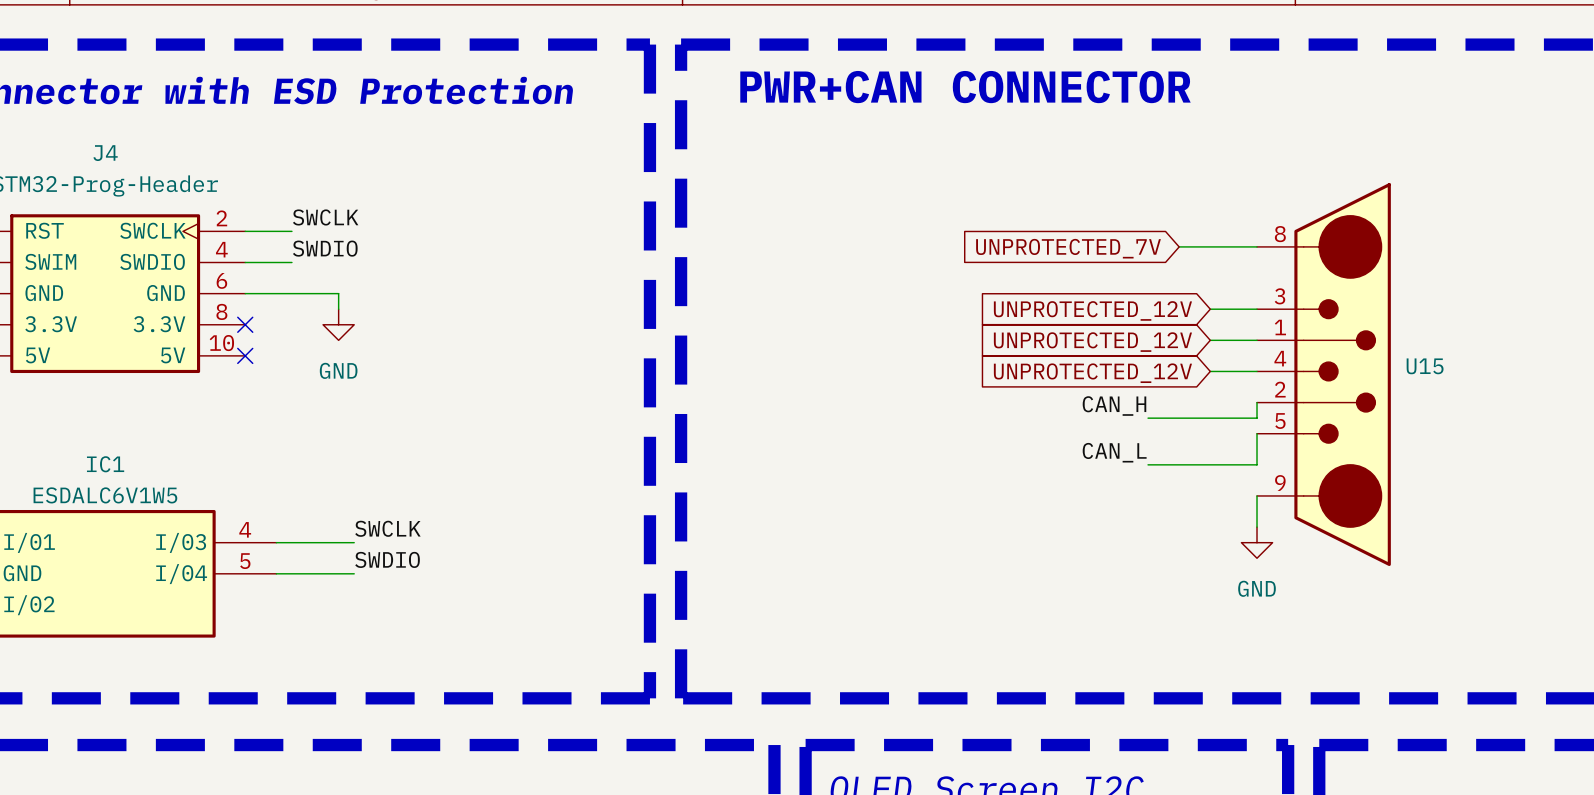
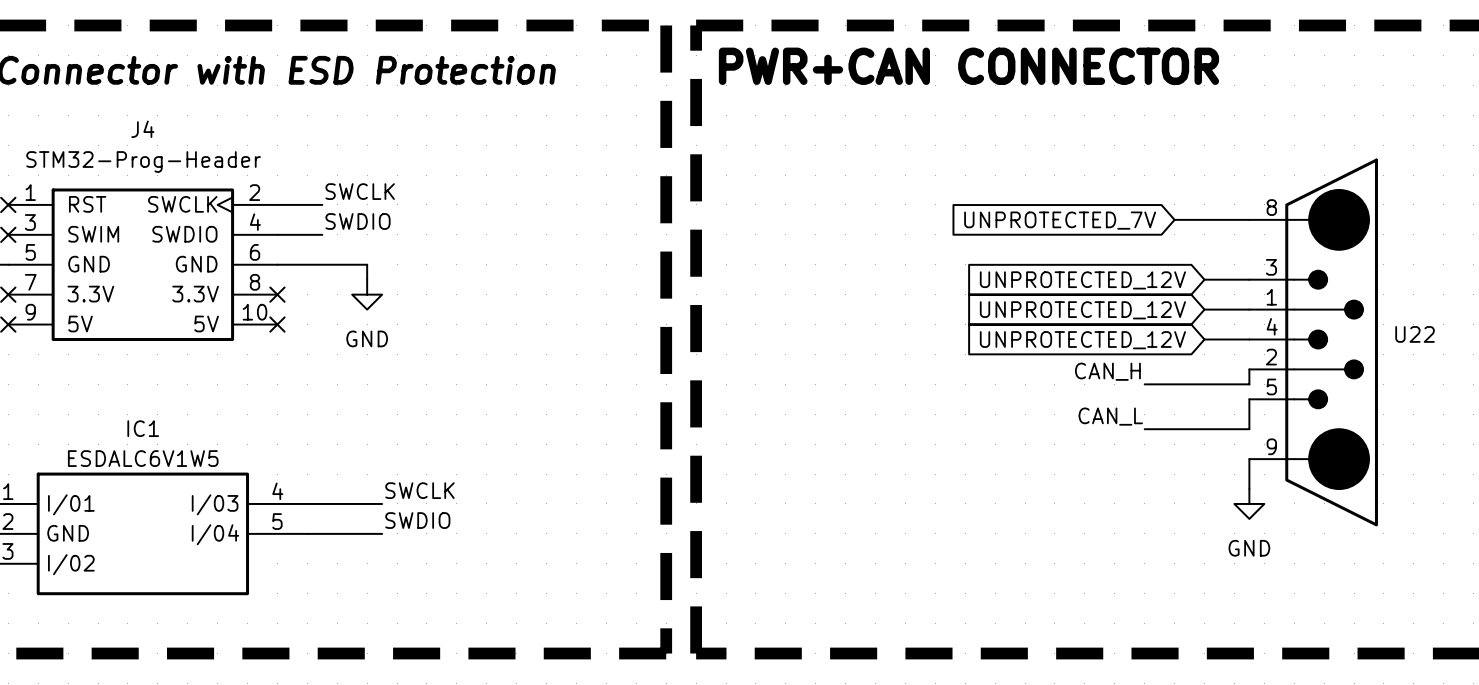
U15 name: U15 (1425, 366) -> U22 (1415, 334)

